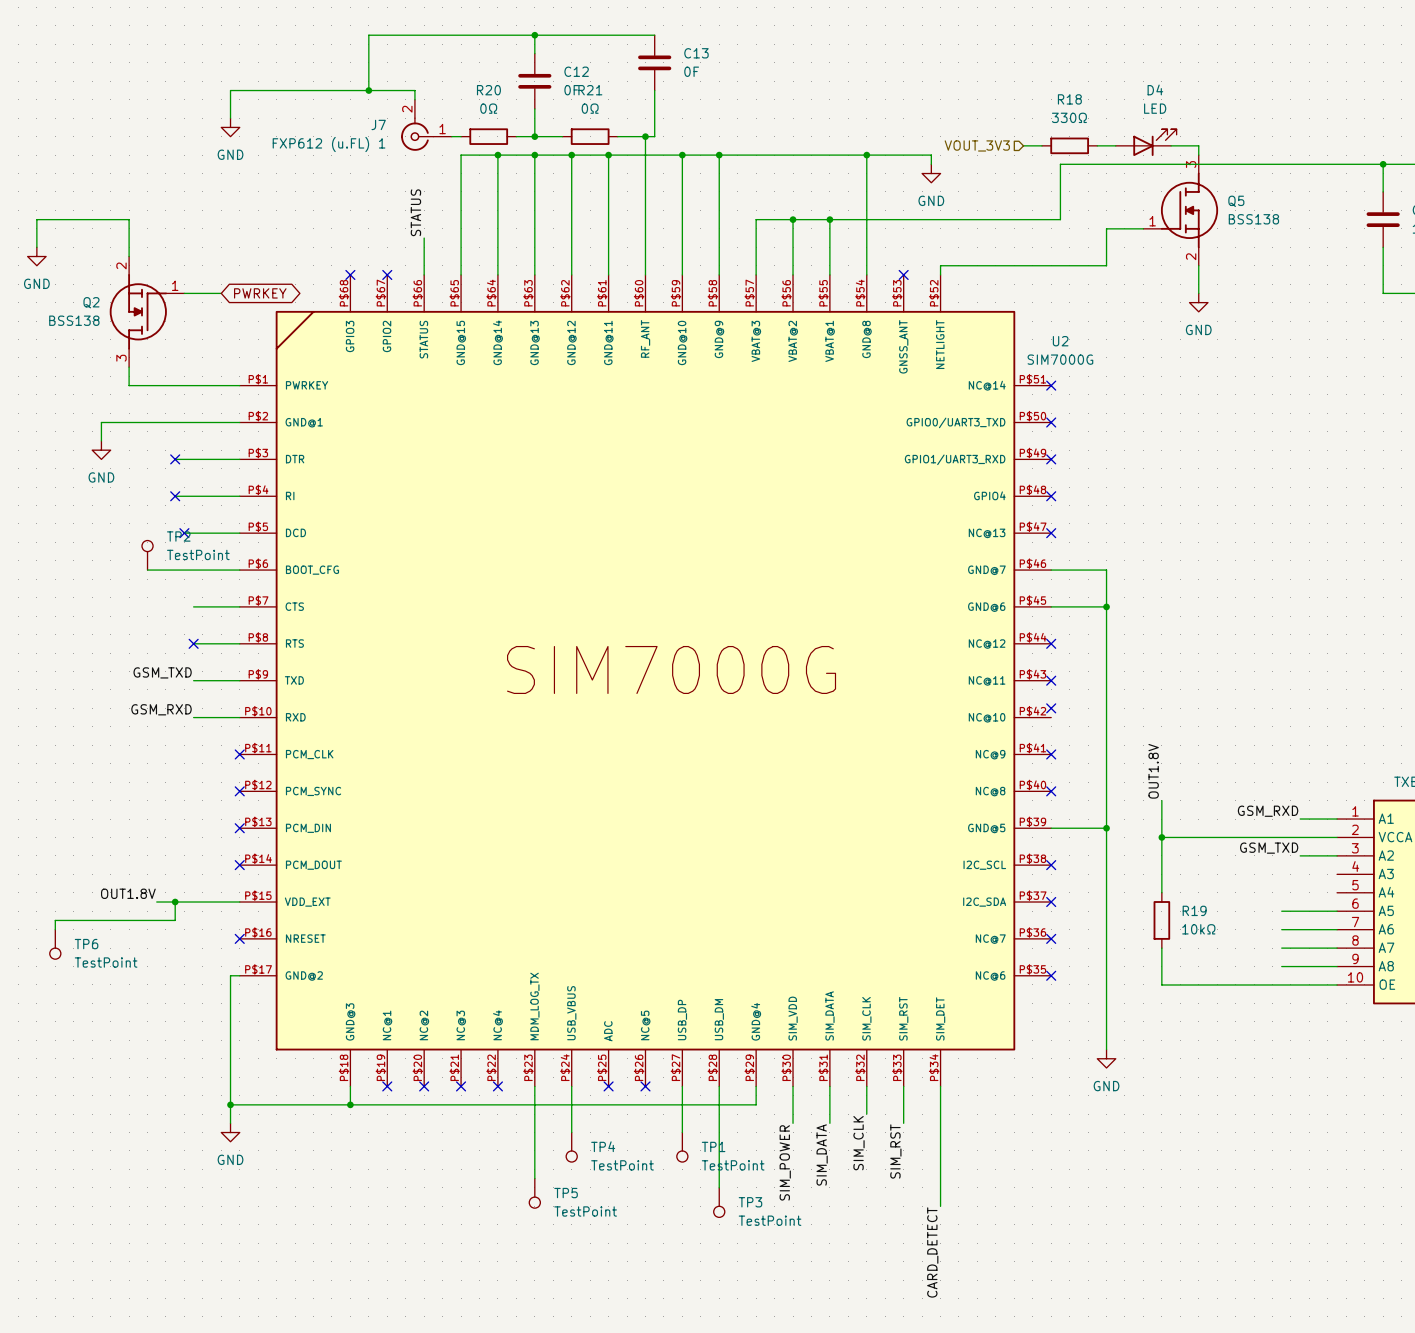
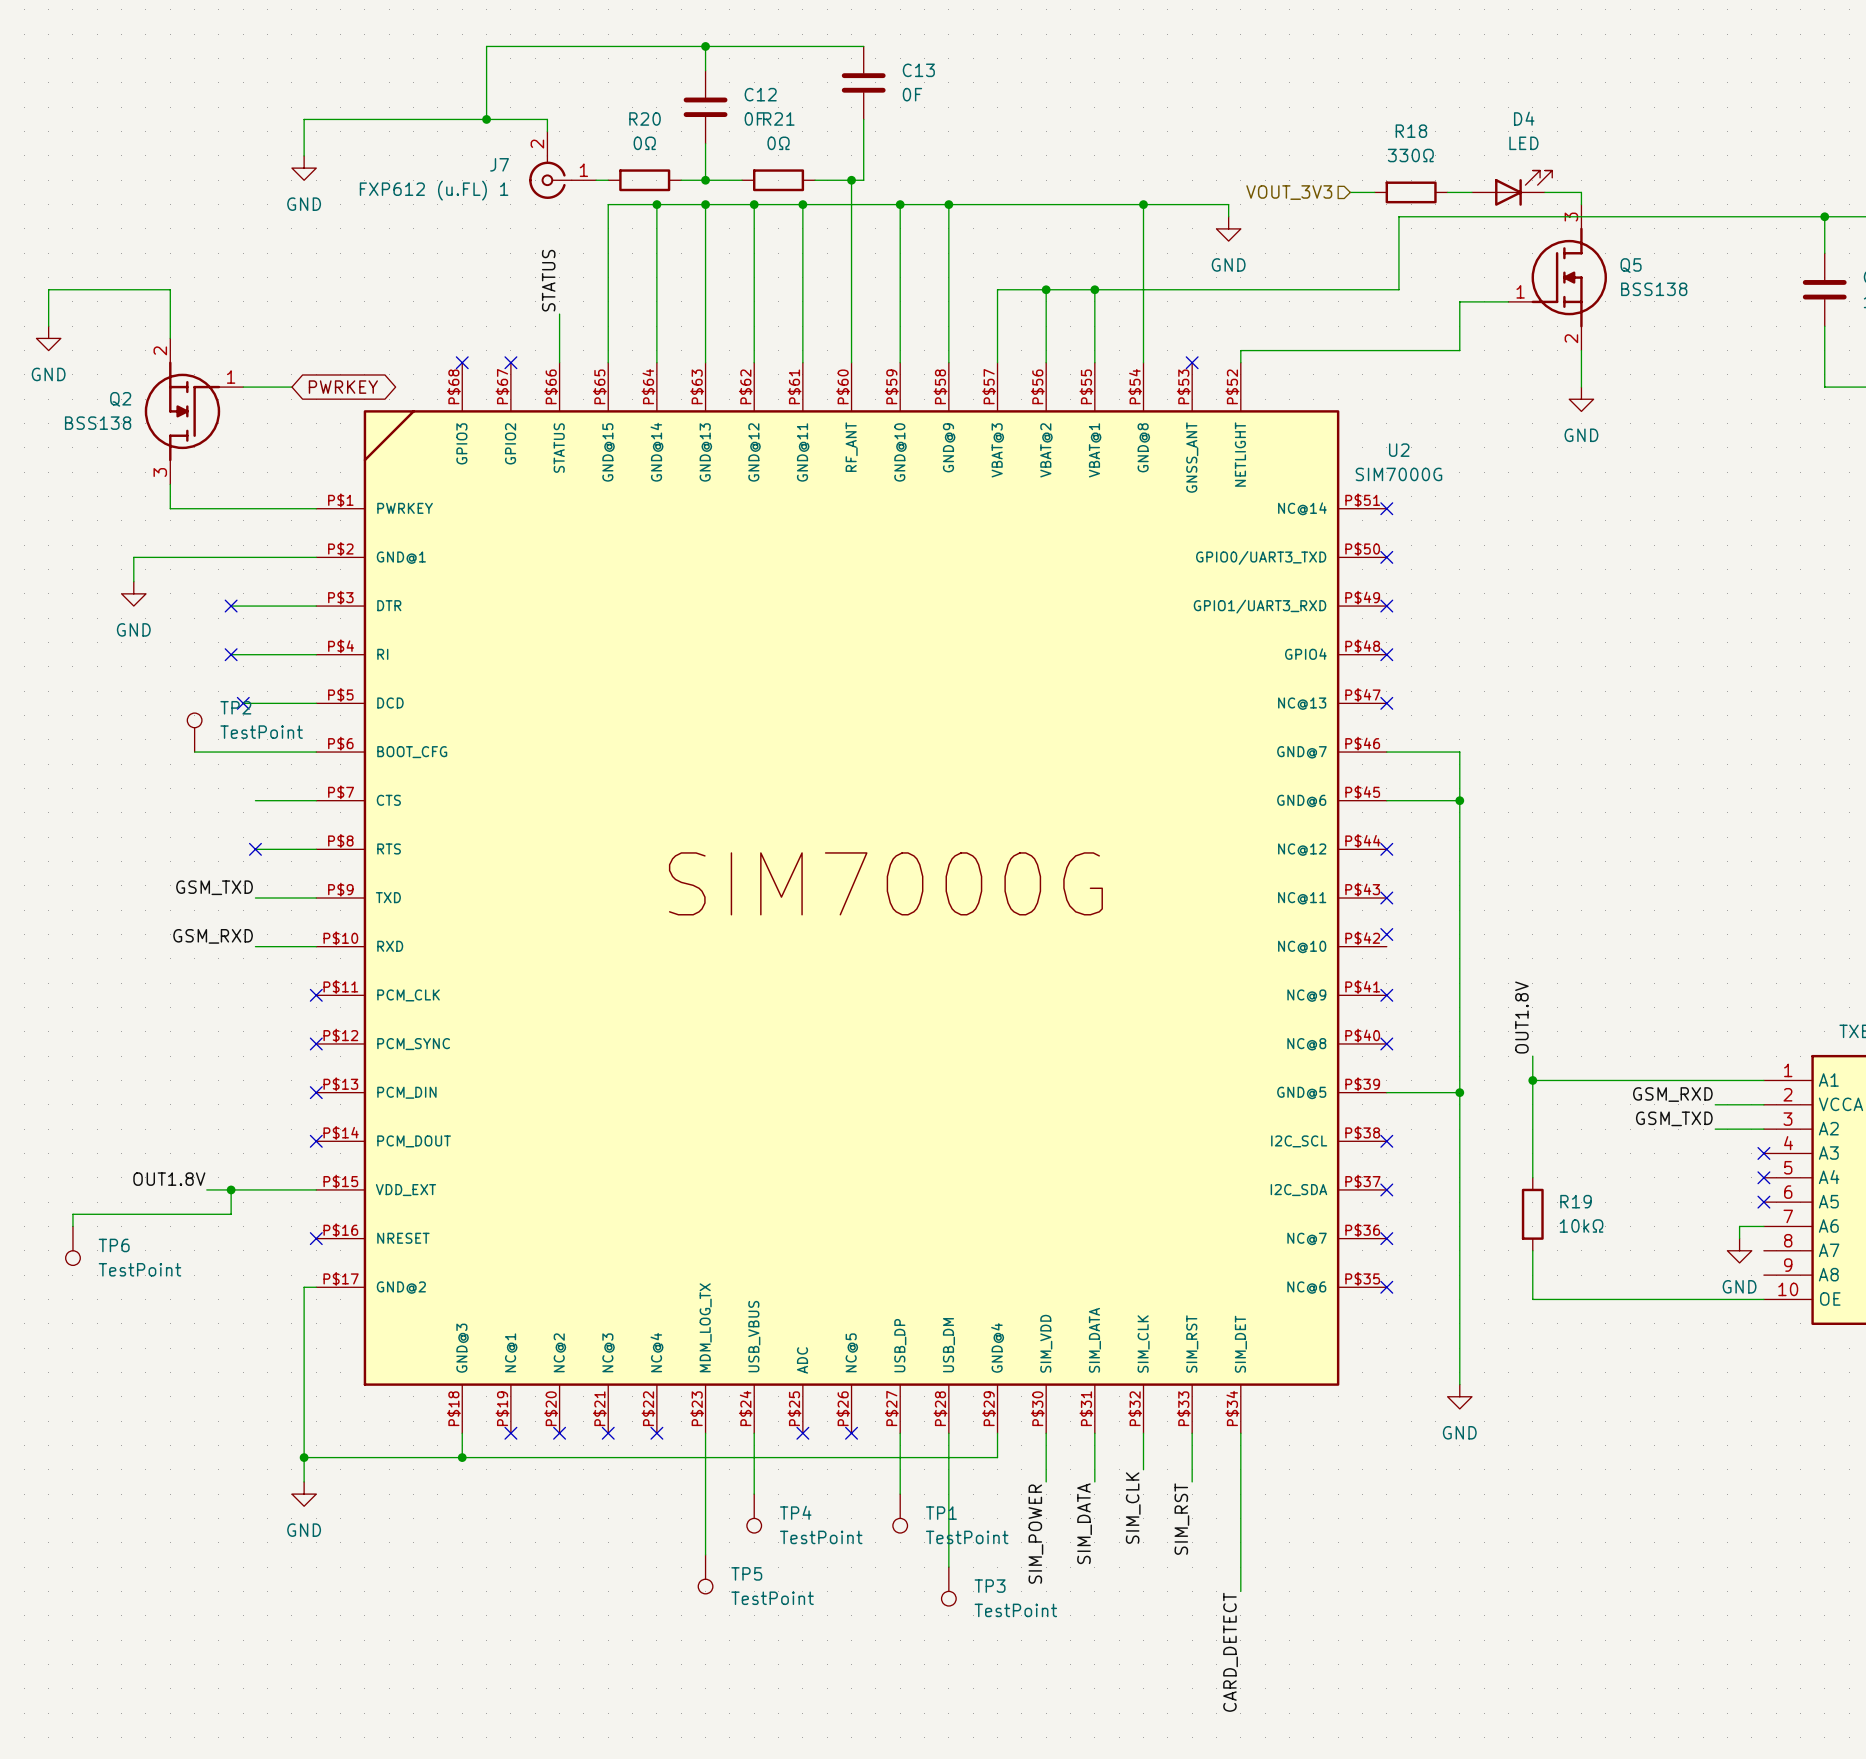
label position: GSM_RXD (1268, 811) -> GSM_RXD (1672, 1094)
wire: (1161, 837) (1300, 837) -> (1532, 1080) (1715, 1080)
junction position: (1161, 837) -> (1532, 1080)
no-connect mark: none -> (1763, 1153)
no-connect mark: none -> (1763, 1177)
wire: (1281, 911) (1337, 911) -> none
no-connect mark: none -> (1763, 1202)
wire: (1281, 929) (1318, 929) -> (1739, 1238) (1739, 1226)
wire: (1281, 948) (1337, 948) -> none
power symbol: none -> GND (1739, 1250)
wire: (1281, 966) (1337, 966) -> none

